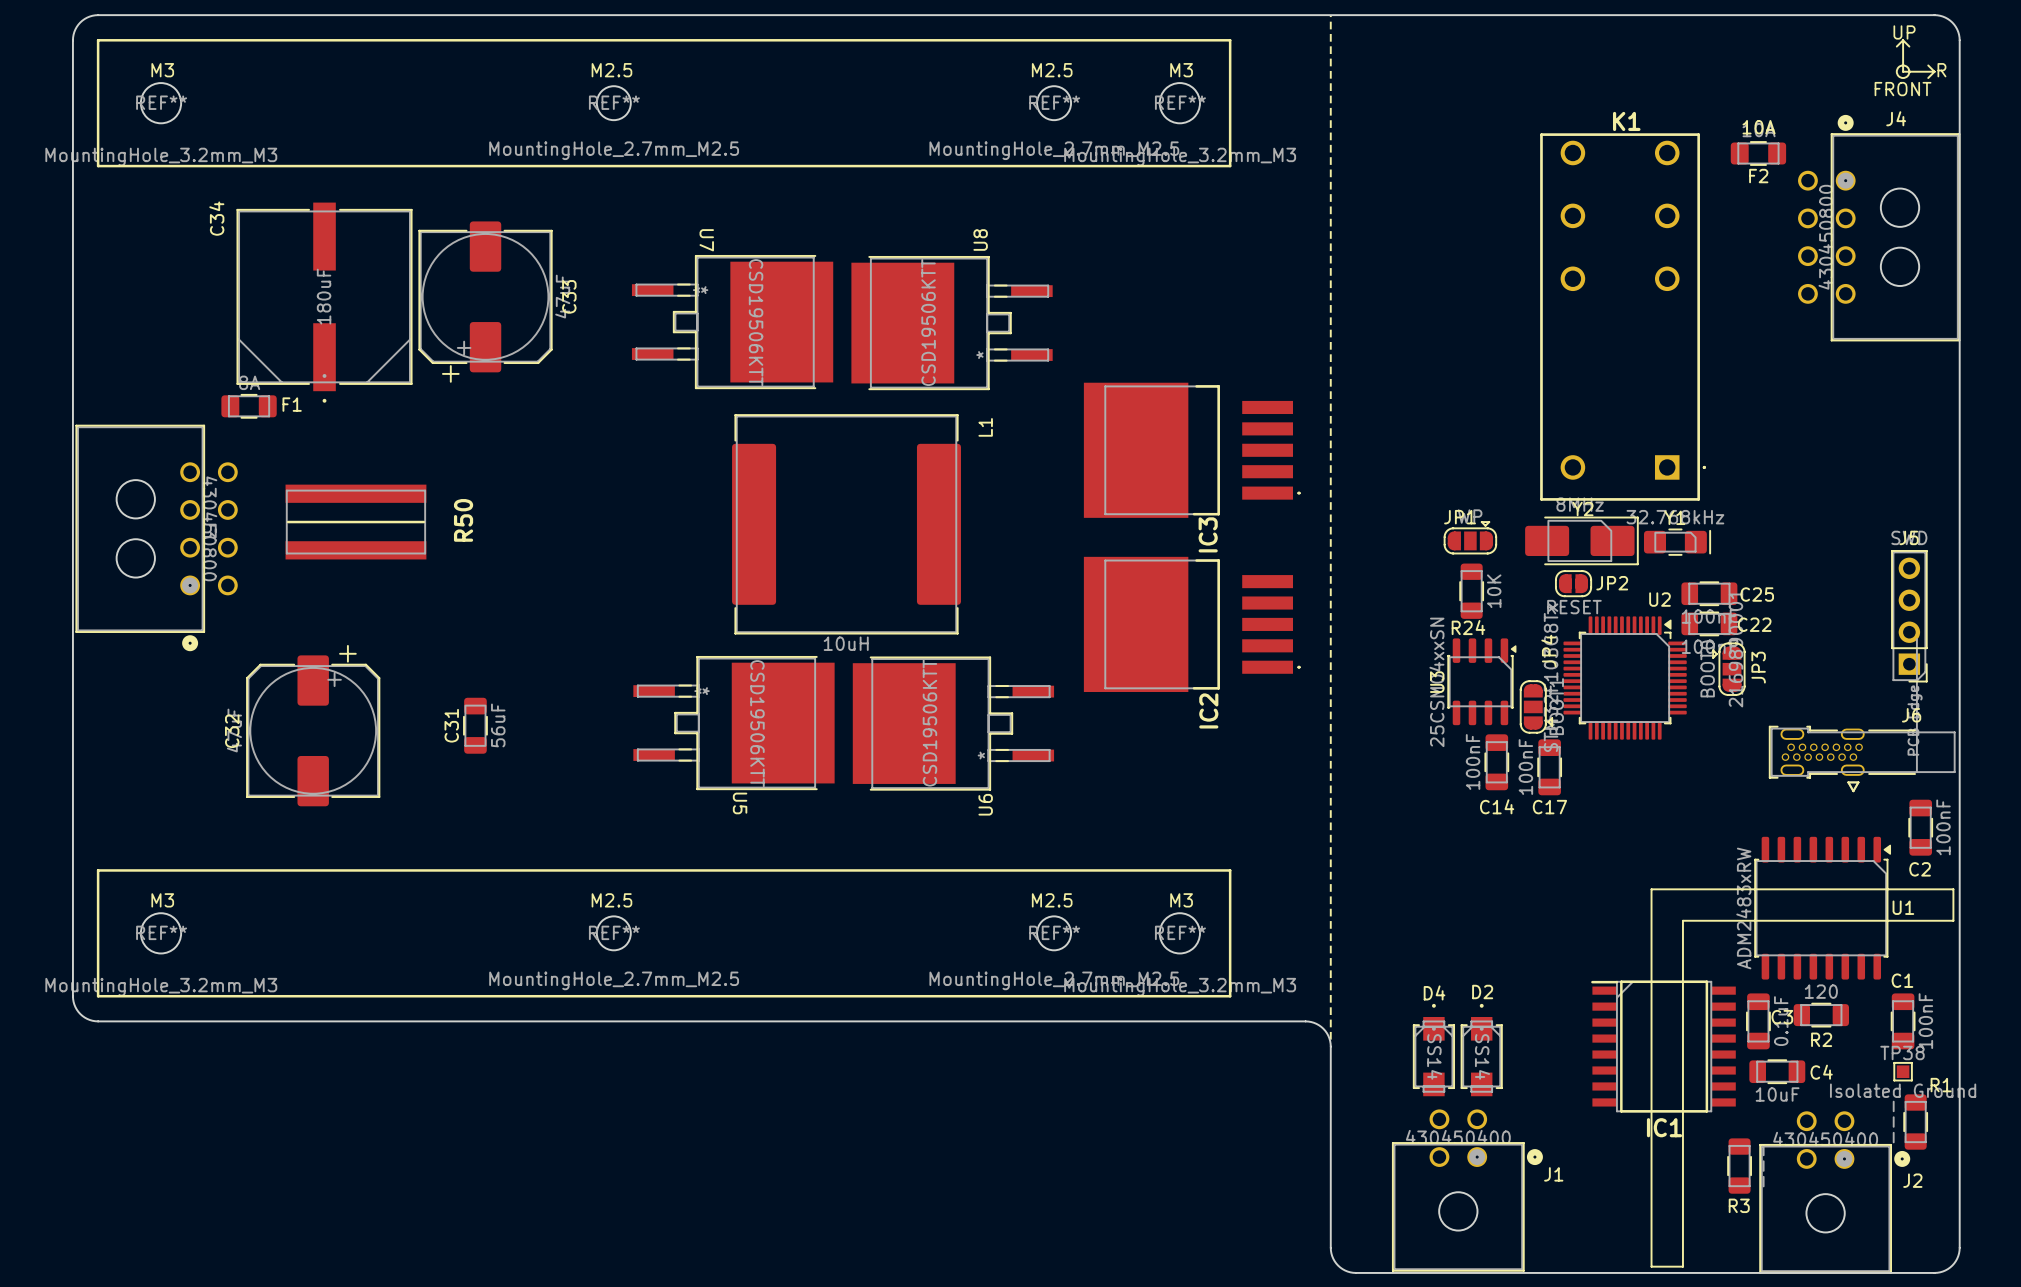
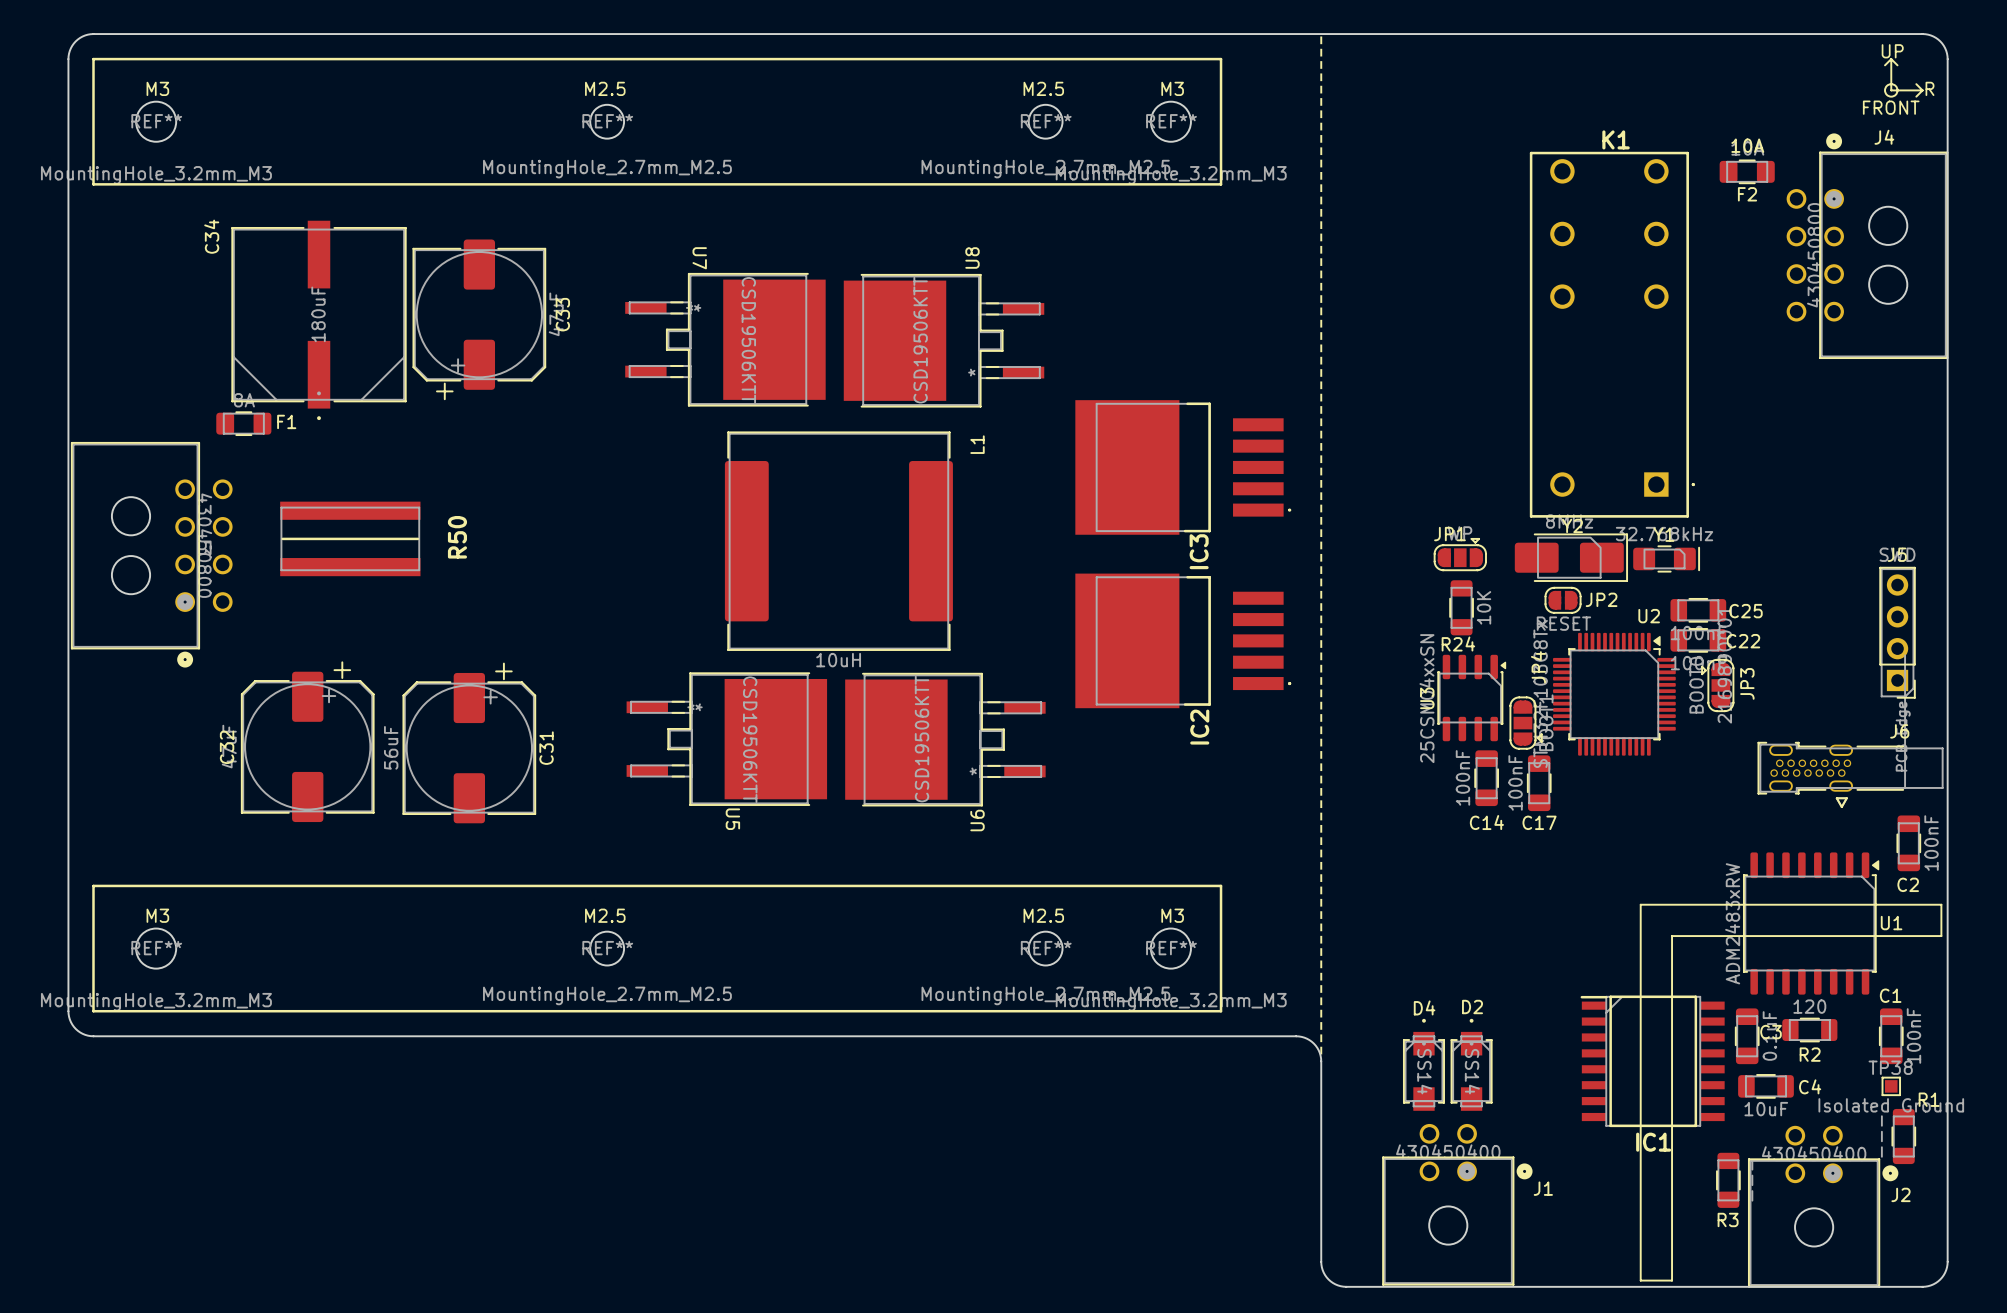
C31 footprint: [463, 697, 488, 754] -> [402, 662, 536, 824]
C31 name position: C31 (451, 725) -> C31 (546, 748)
C31 value position: 56uF (498, 725) -> 56uF (391, 747)

